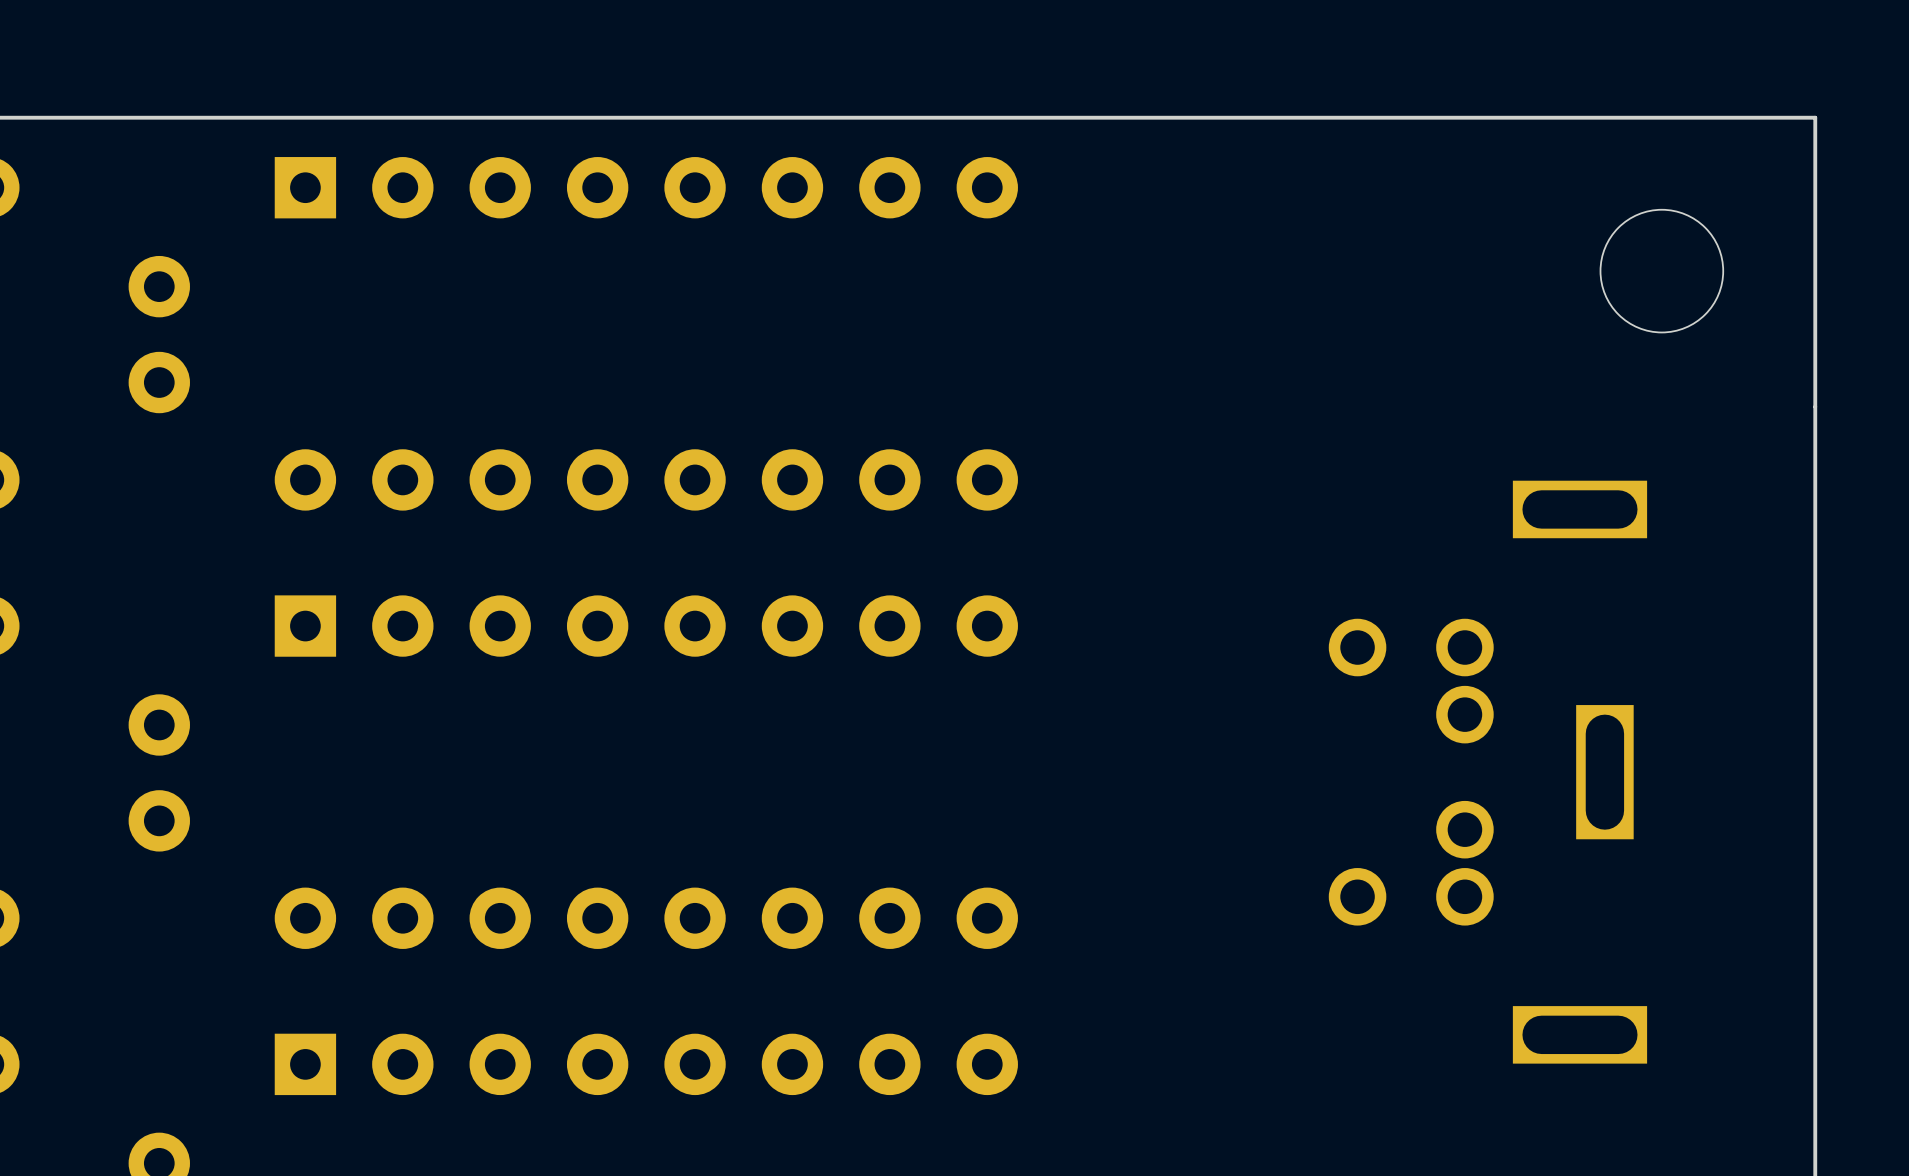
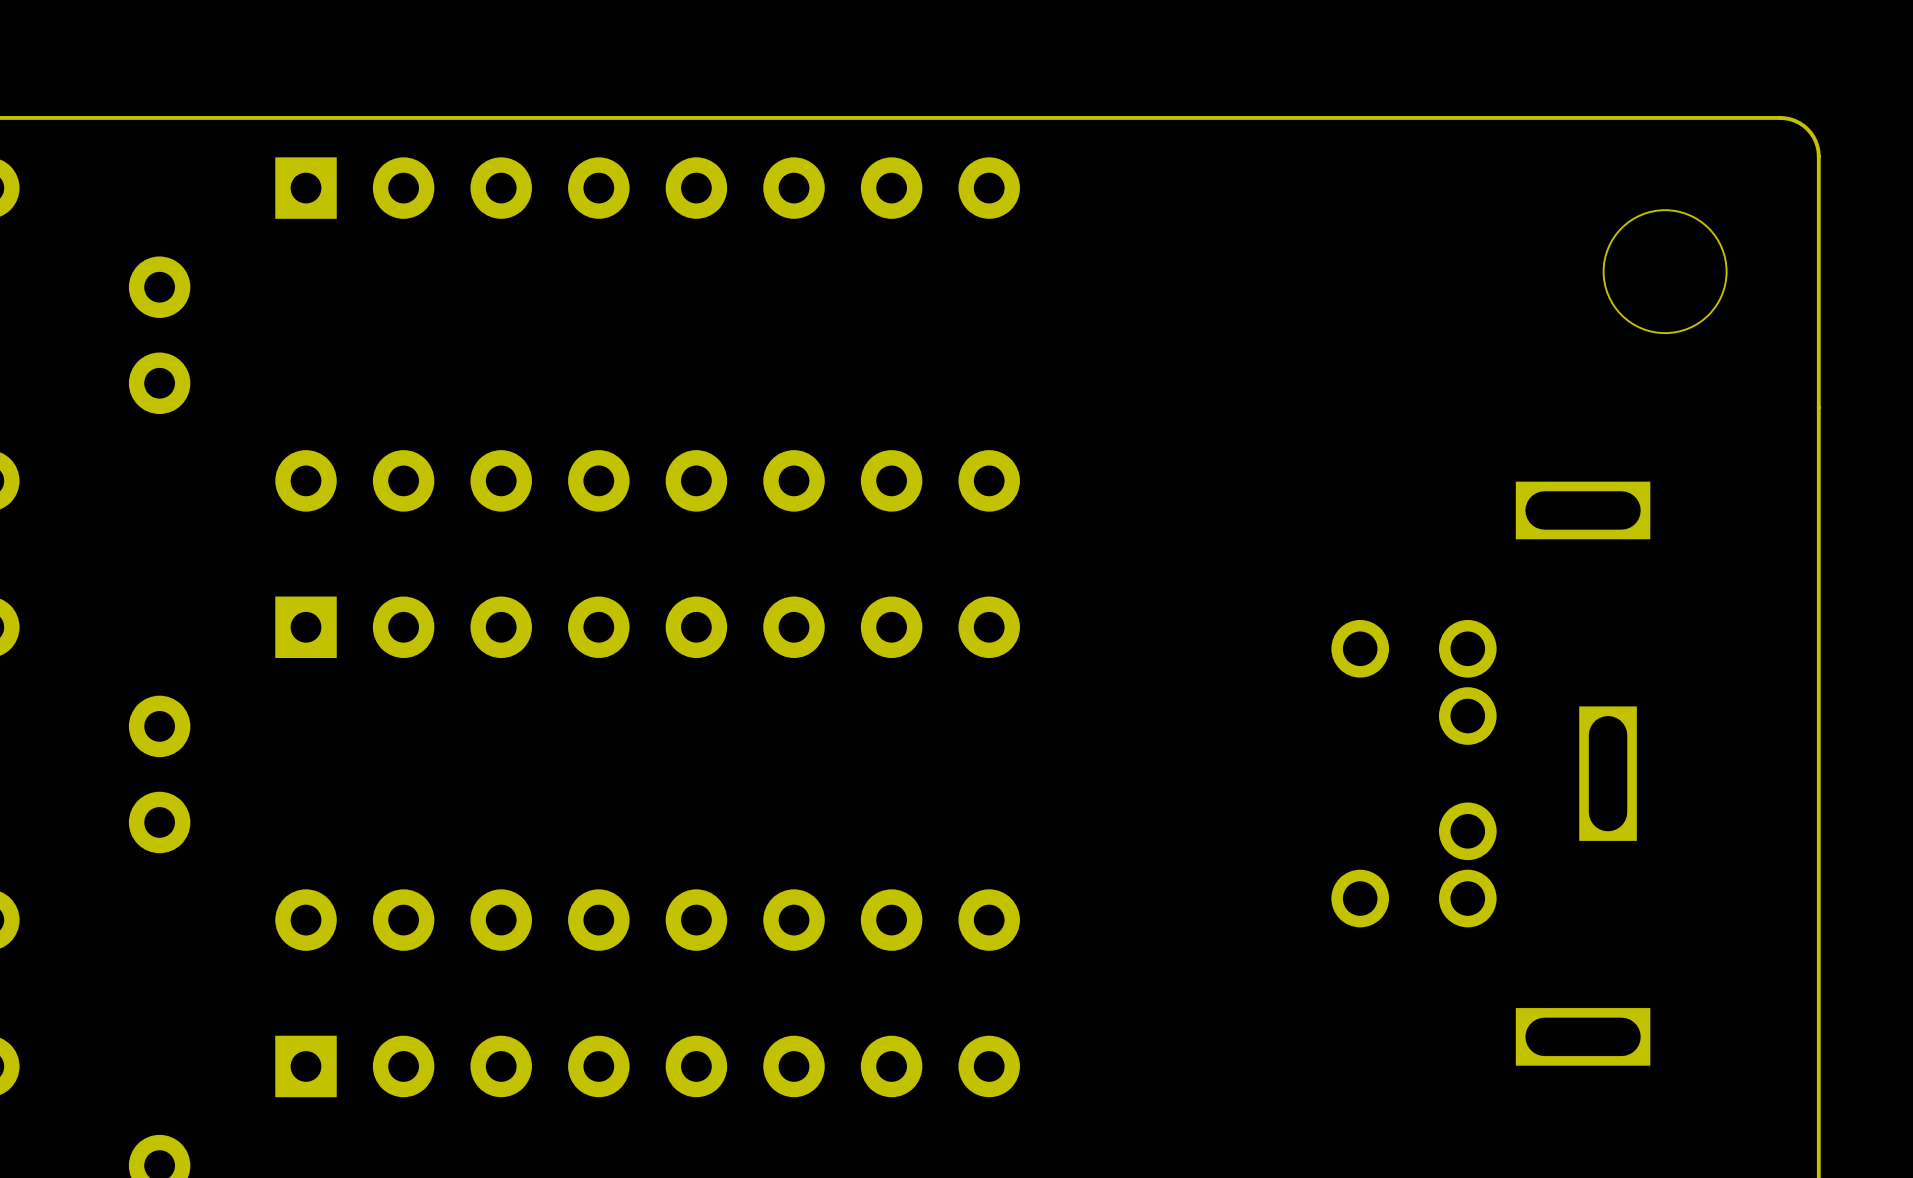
board edge: (1776, 117) (1815, 117) (1815, 156) -> (1780, 117) (1795, 120) (1807, 129) (1815, 141) (1818, 156)

